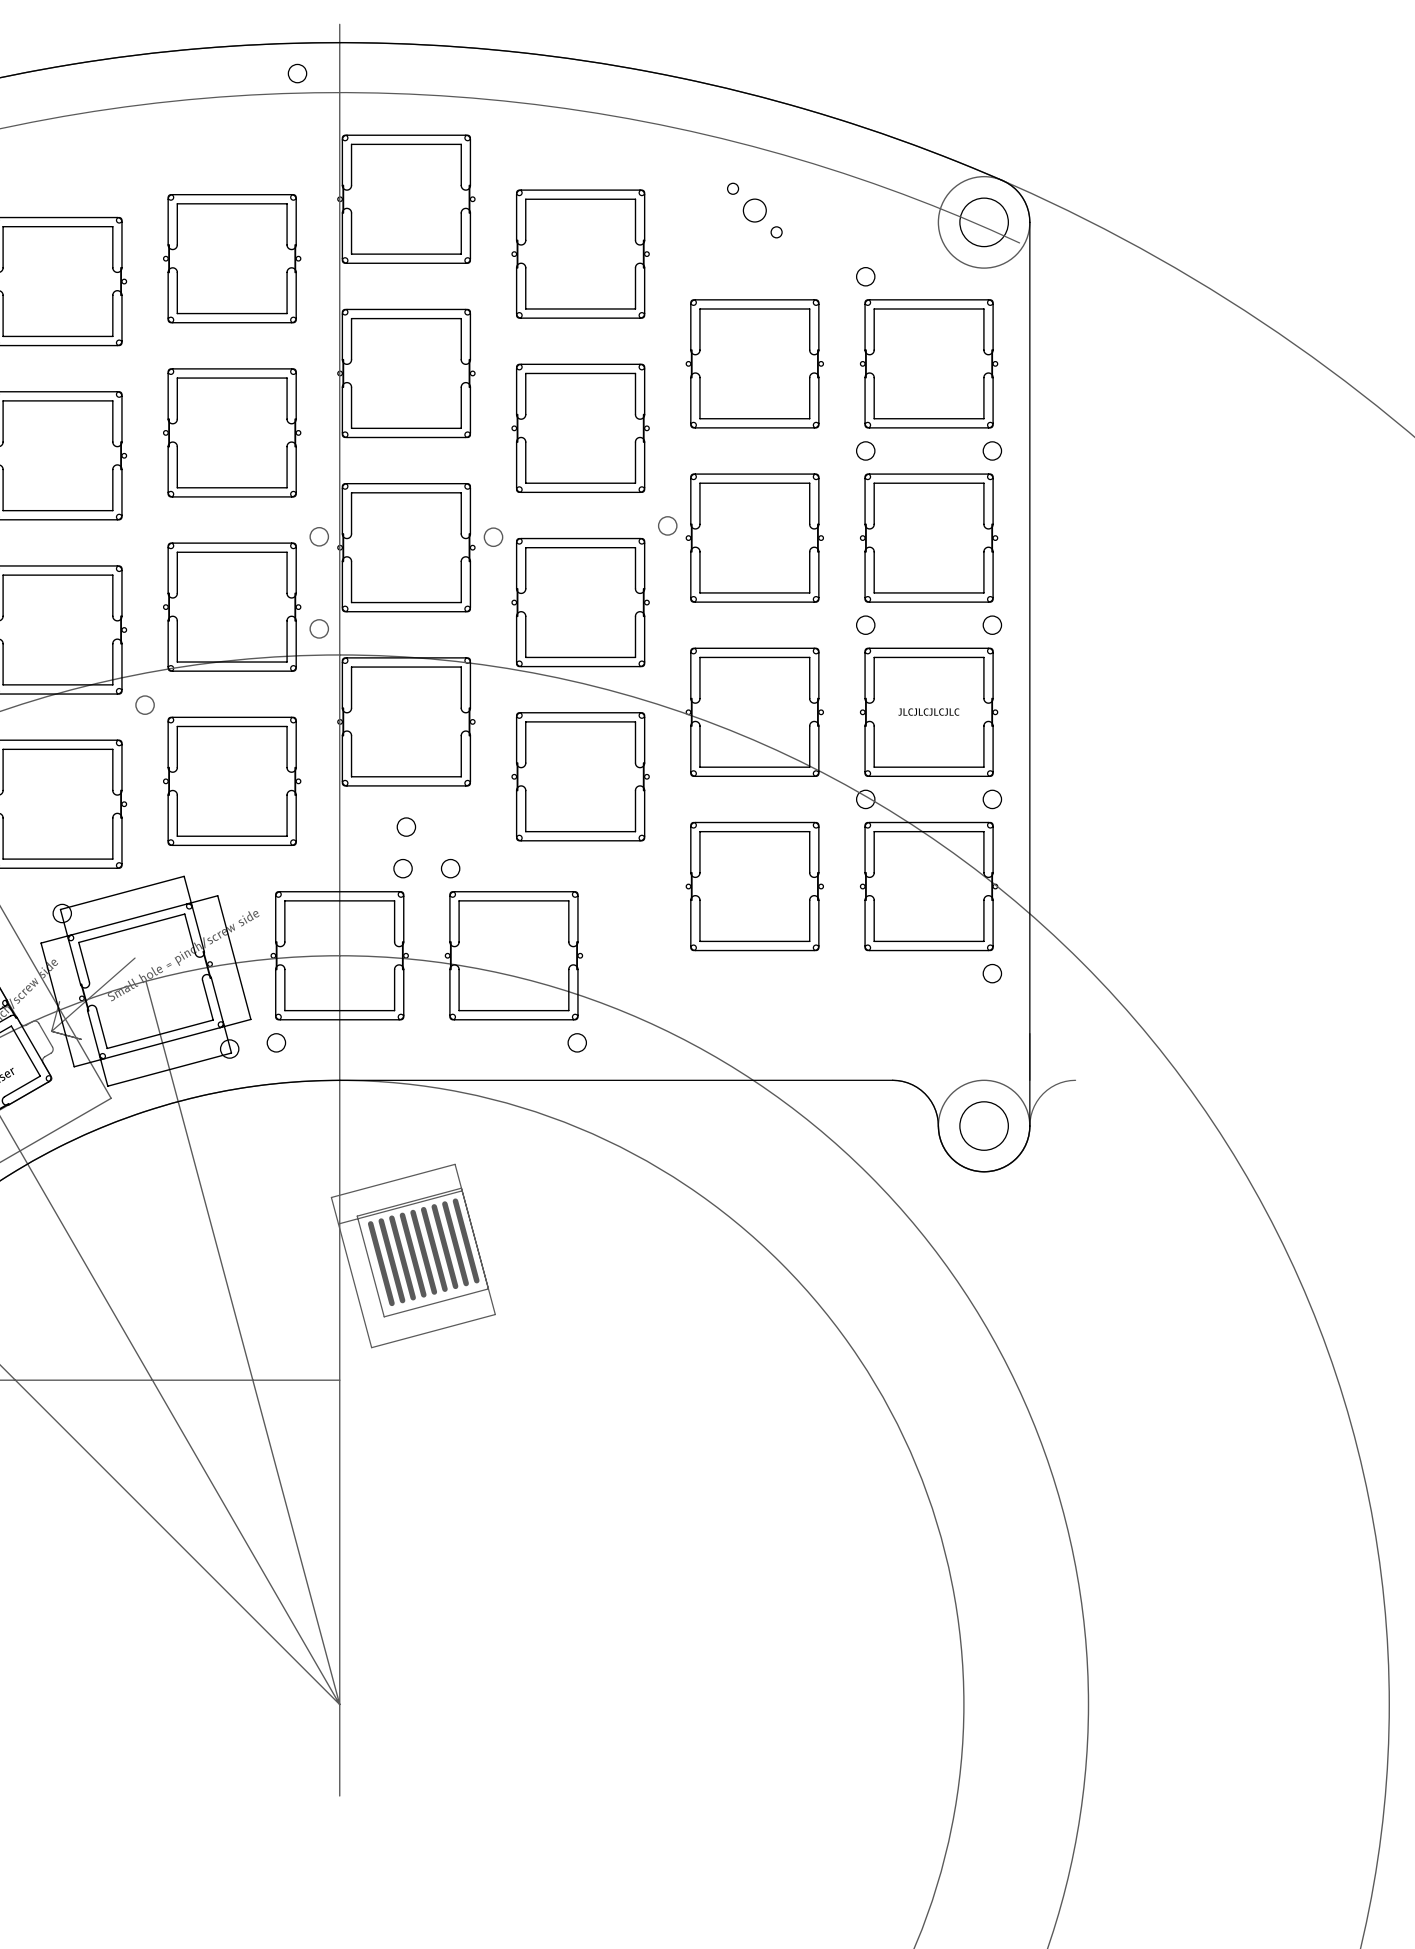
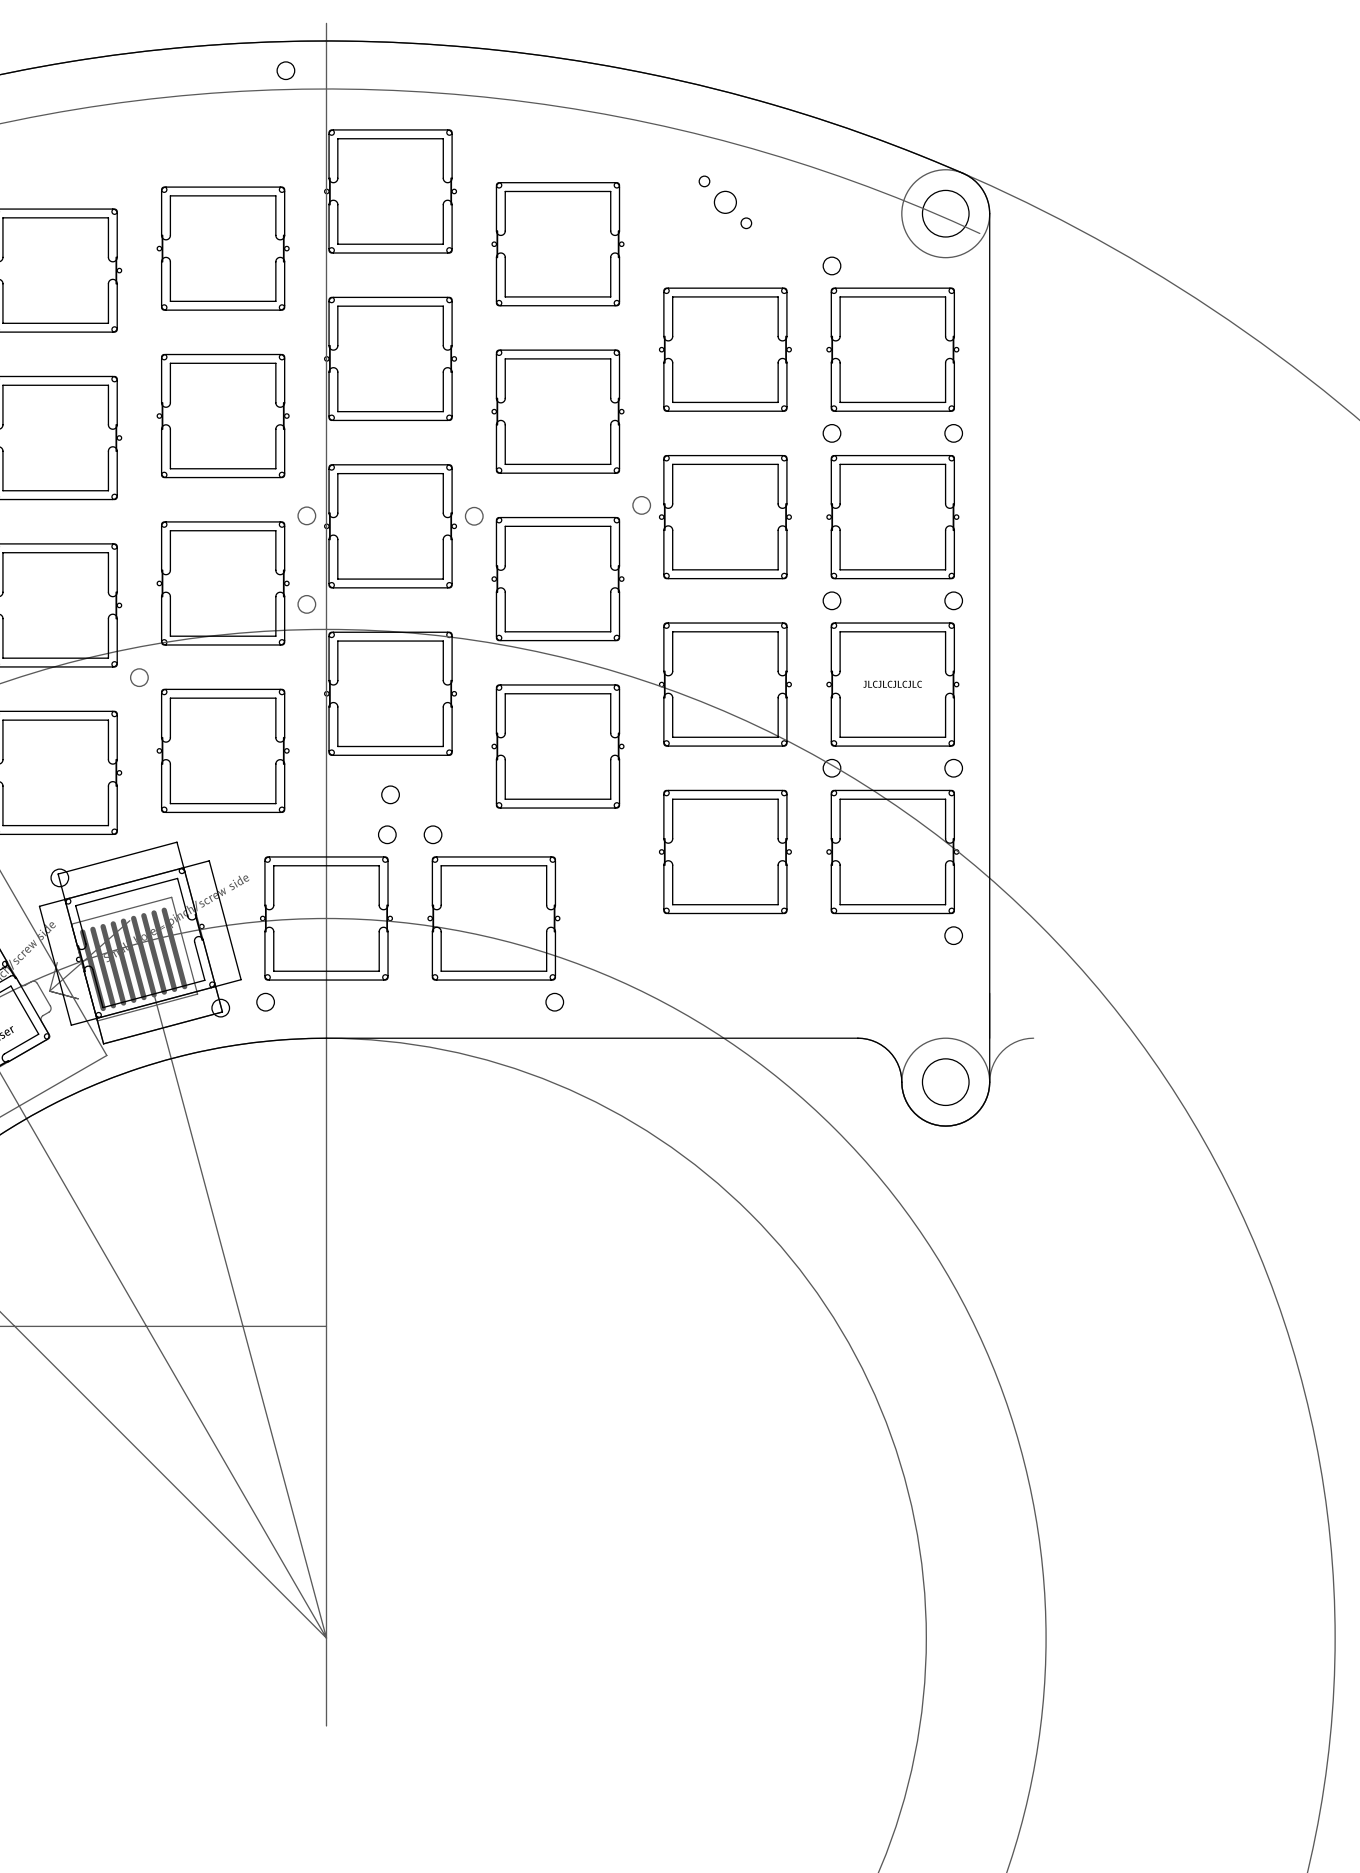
drawing: none -> [64, 867, 223, 1045]
drawing: [331, 1164, 496, 1348] -> none

